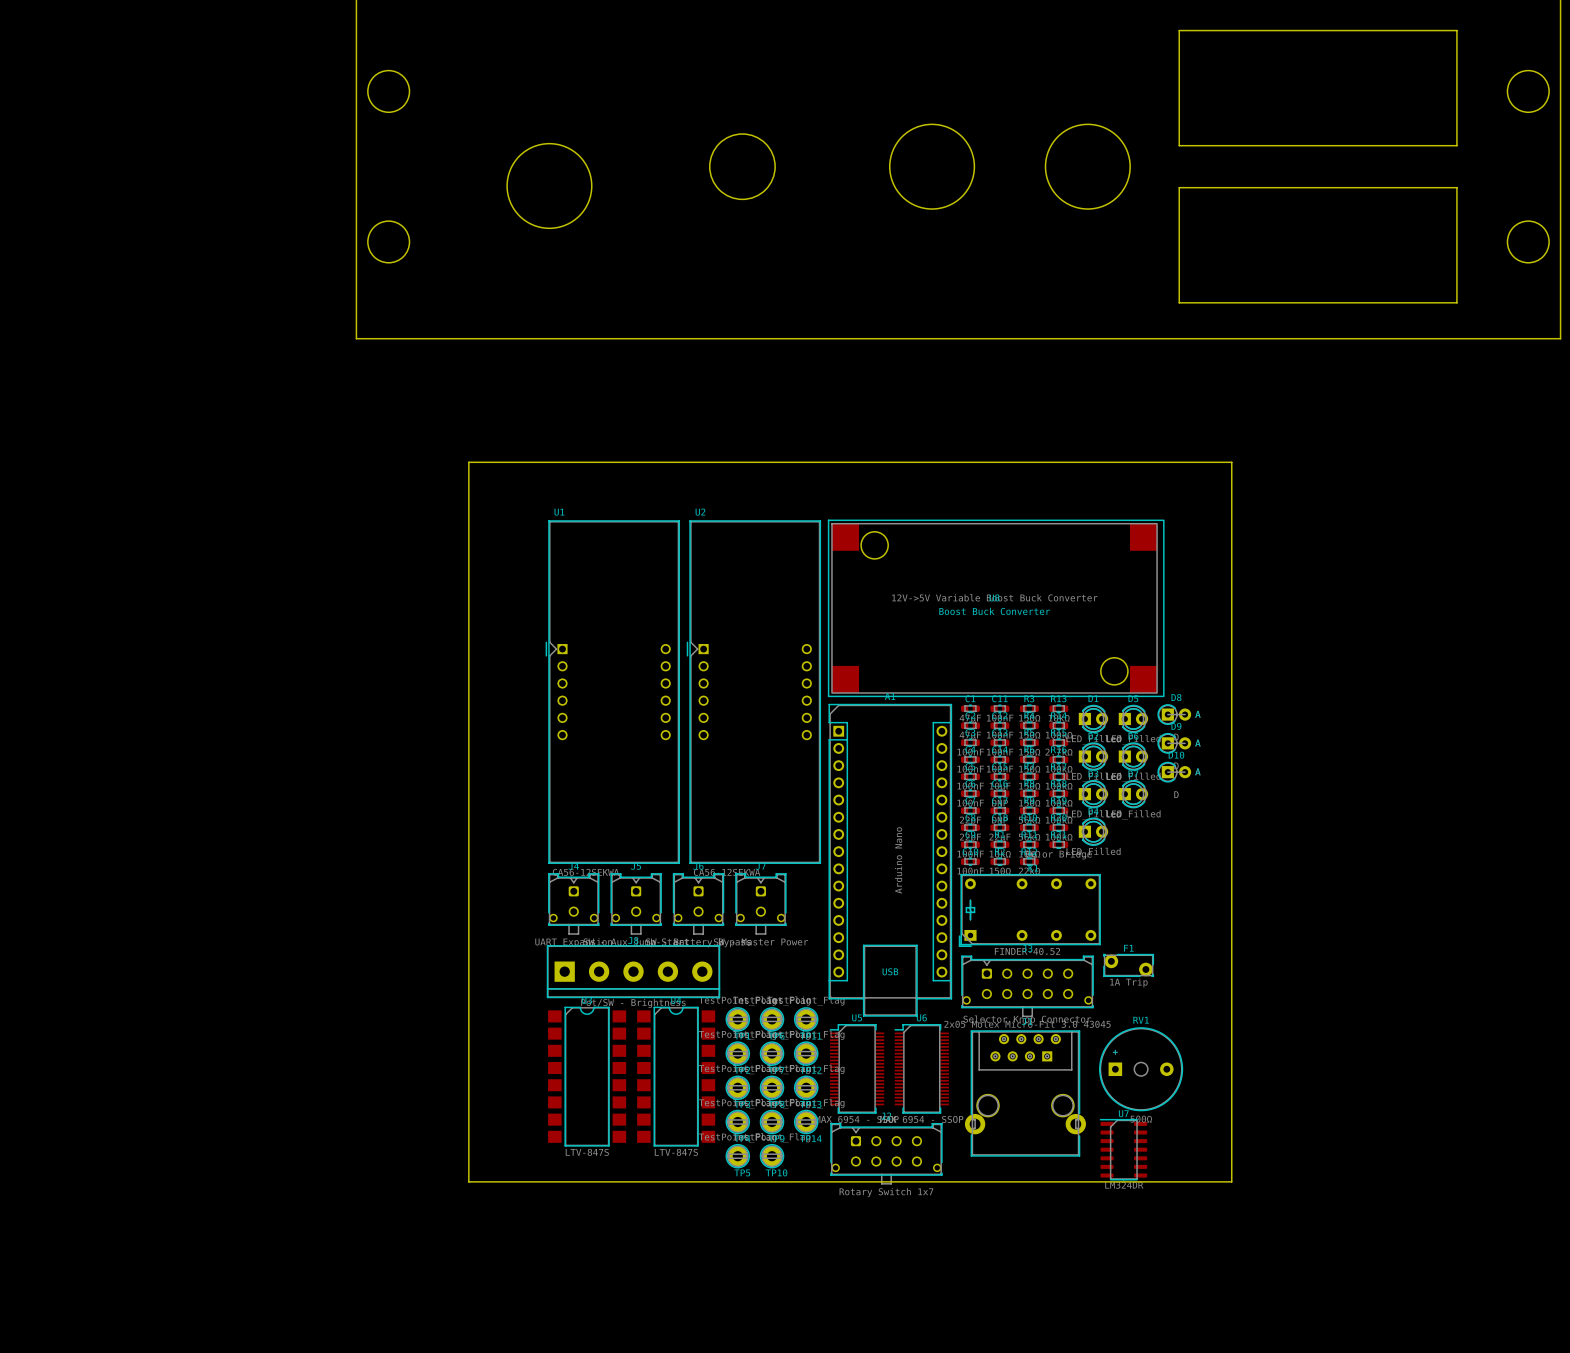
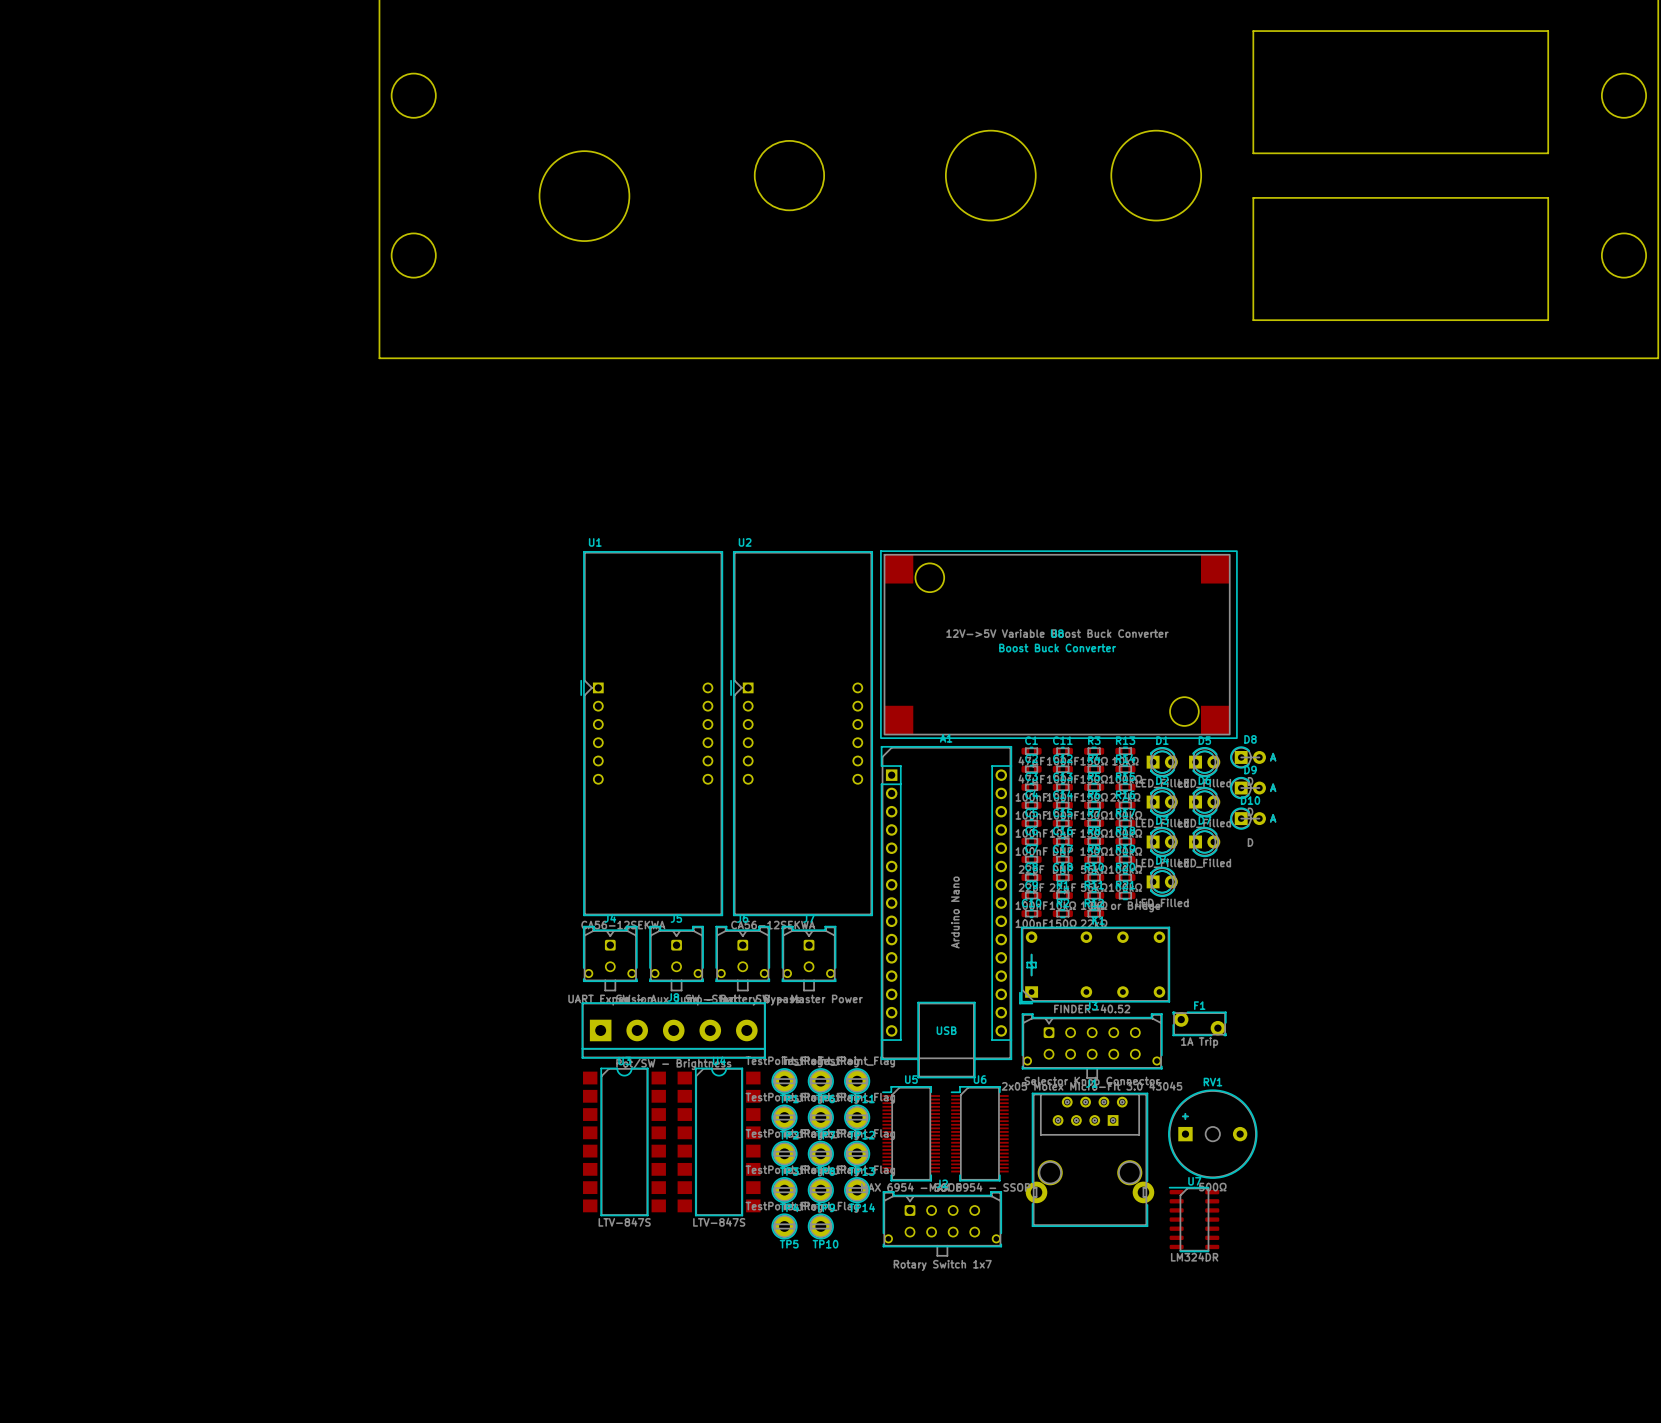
board edge: (468, 462) (1231, 462) (1231, 1181) (468, 1181) (468, 462) -> none

